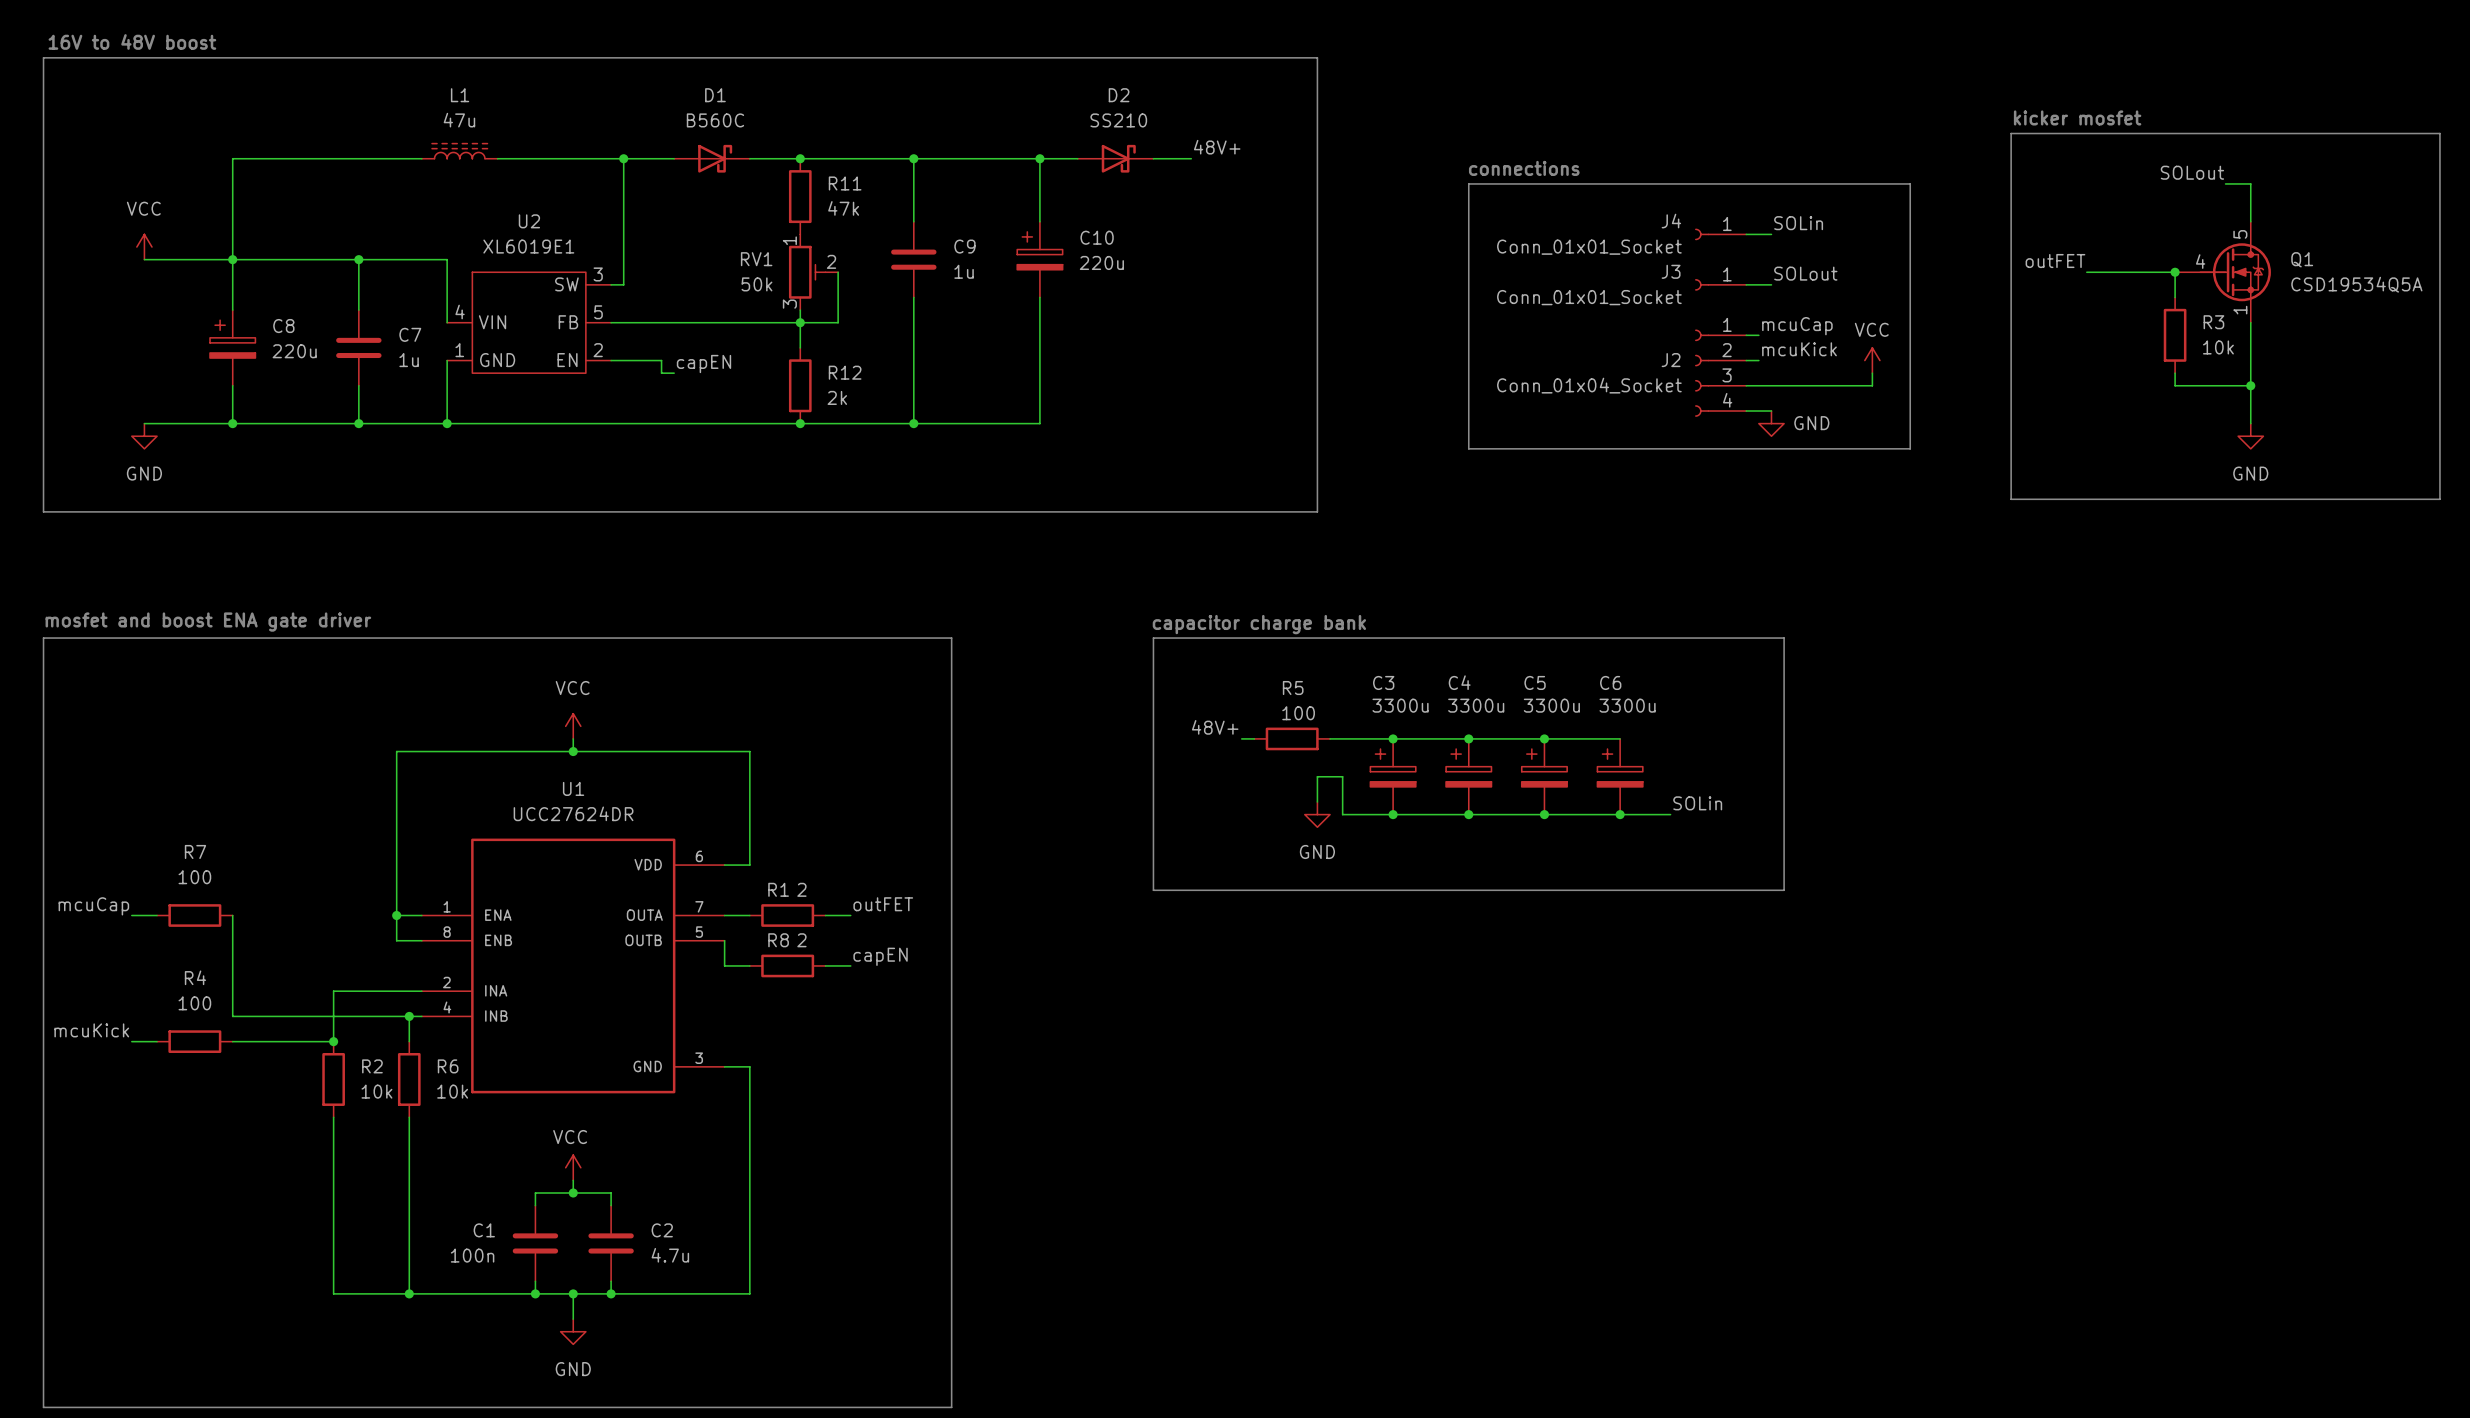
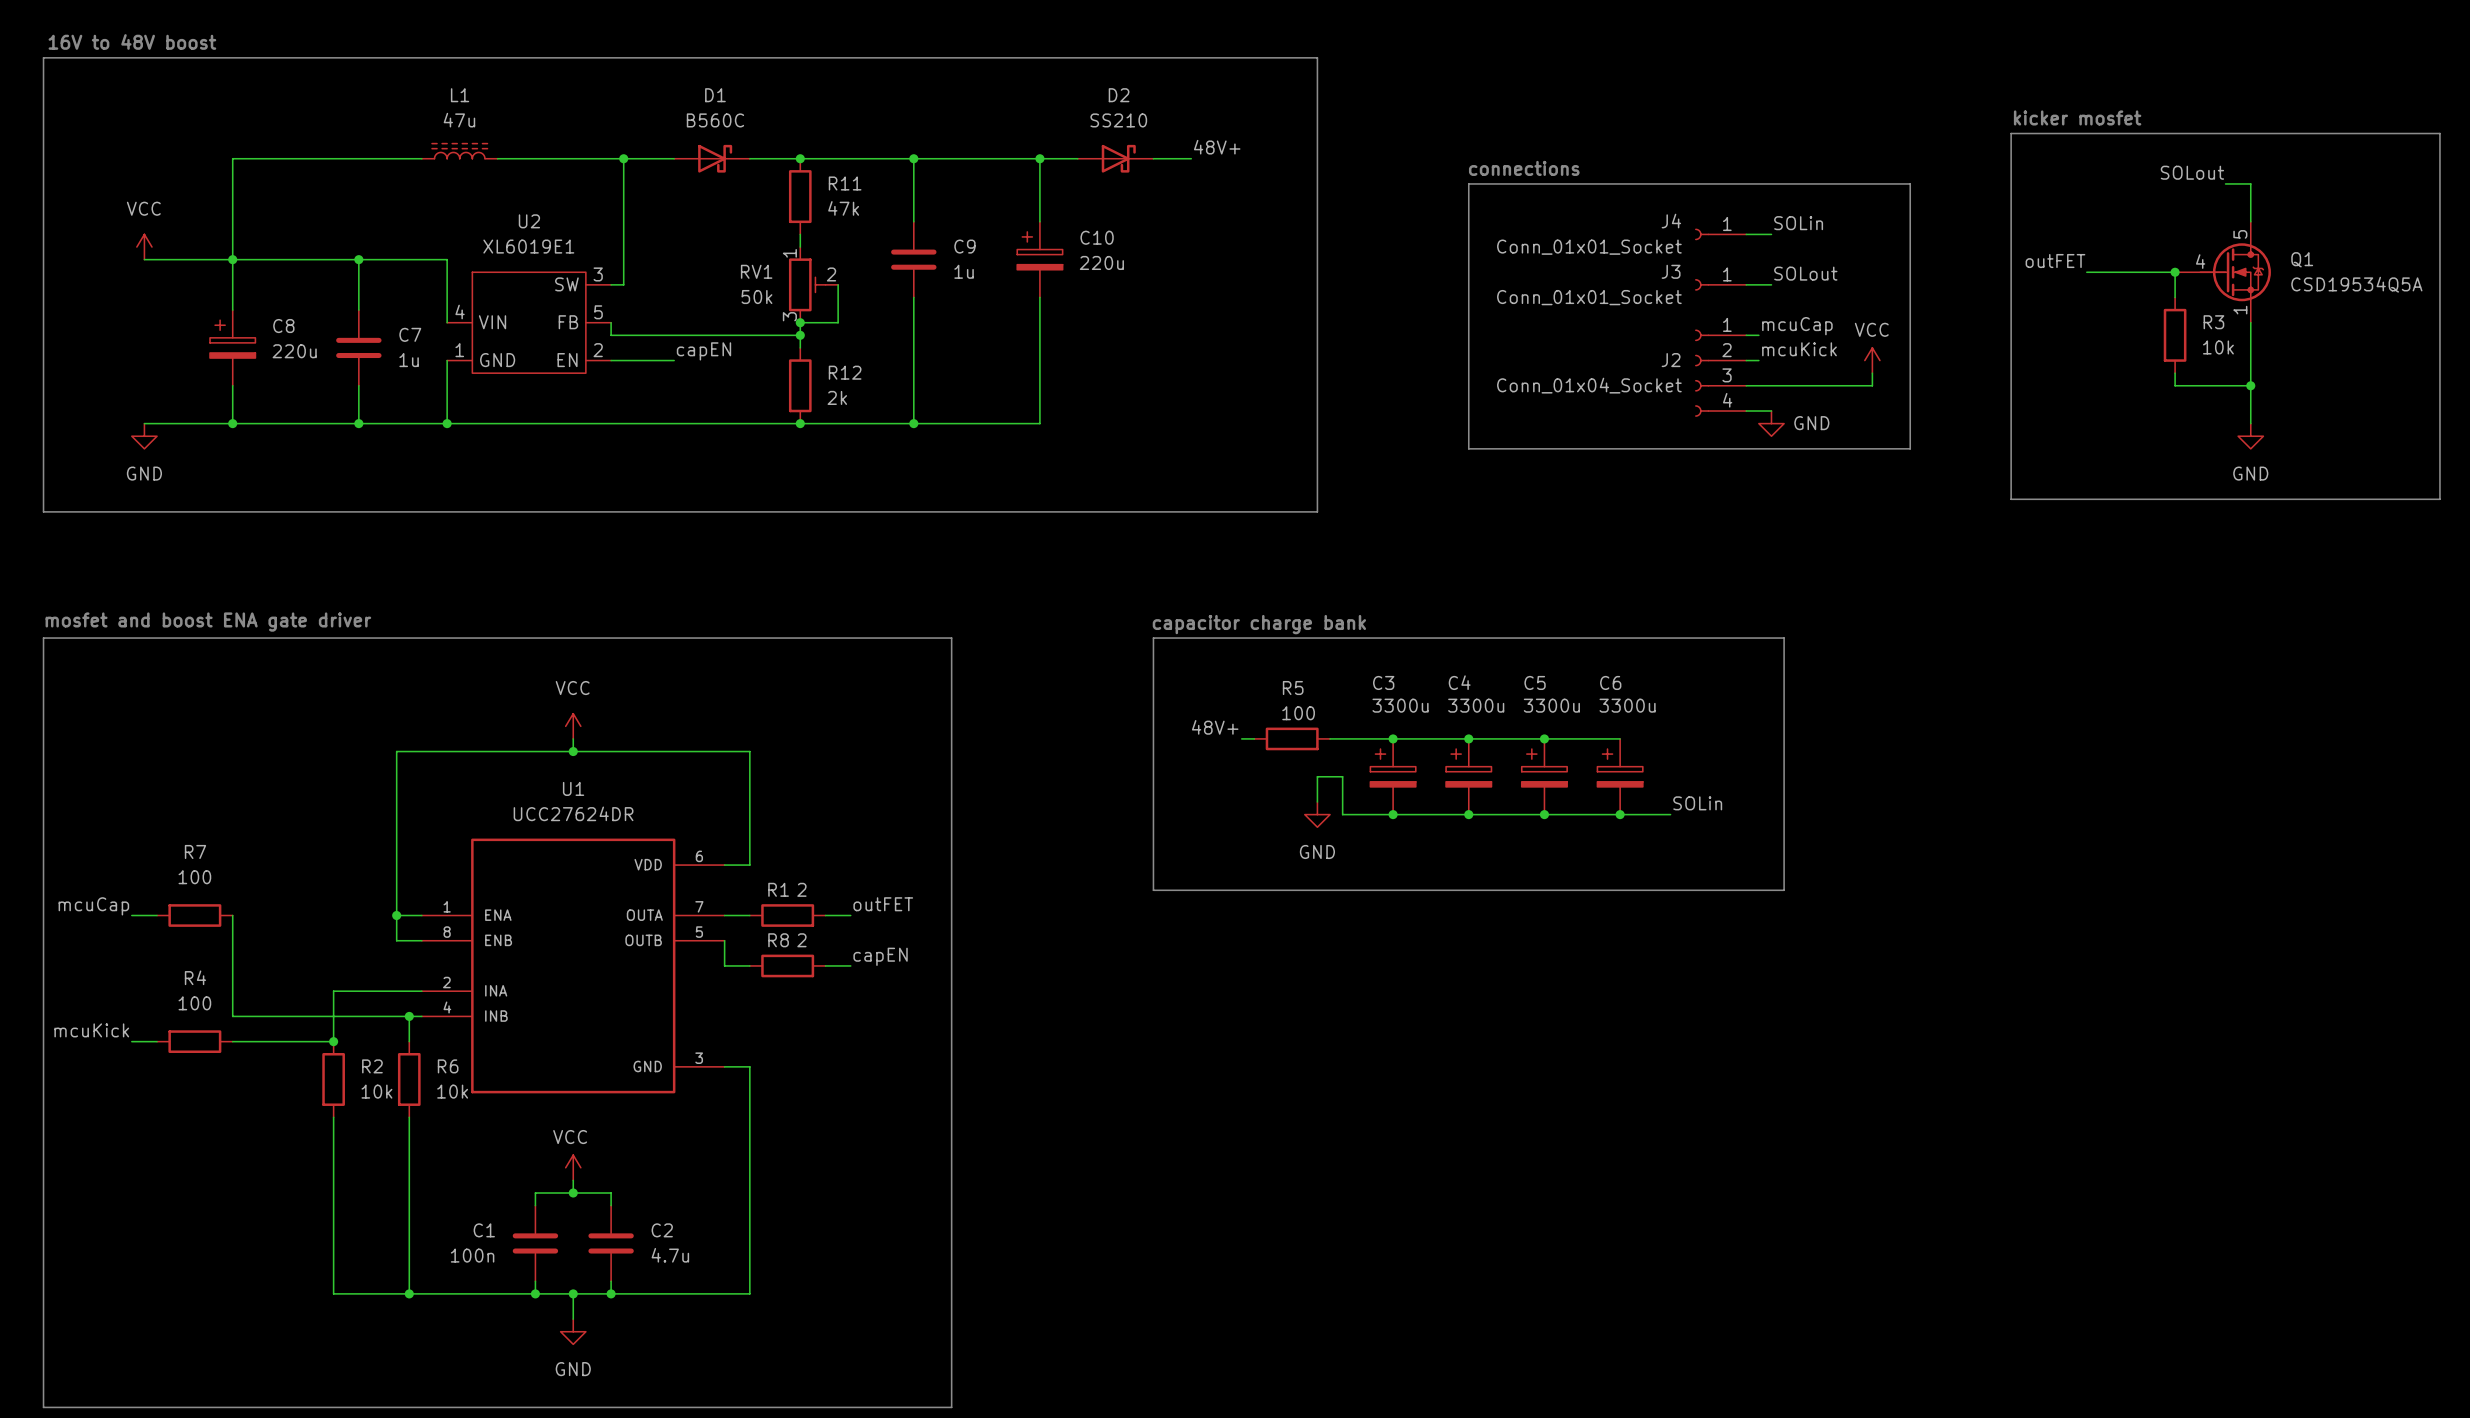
RV1 position: (813, 272) -> (813, 284)
wire: (800, 310) (800, 322) (611, 322) -> (800, 335) (611, 335) (611, 322)
junction: none -> (800, 335)
wire: (661, 360) (661, 373) (674, 373) -> (661, 360) (674, 360)
label position: capEN (703, 364) -> capEN (703, 351)

